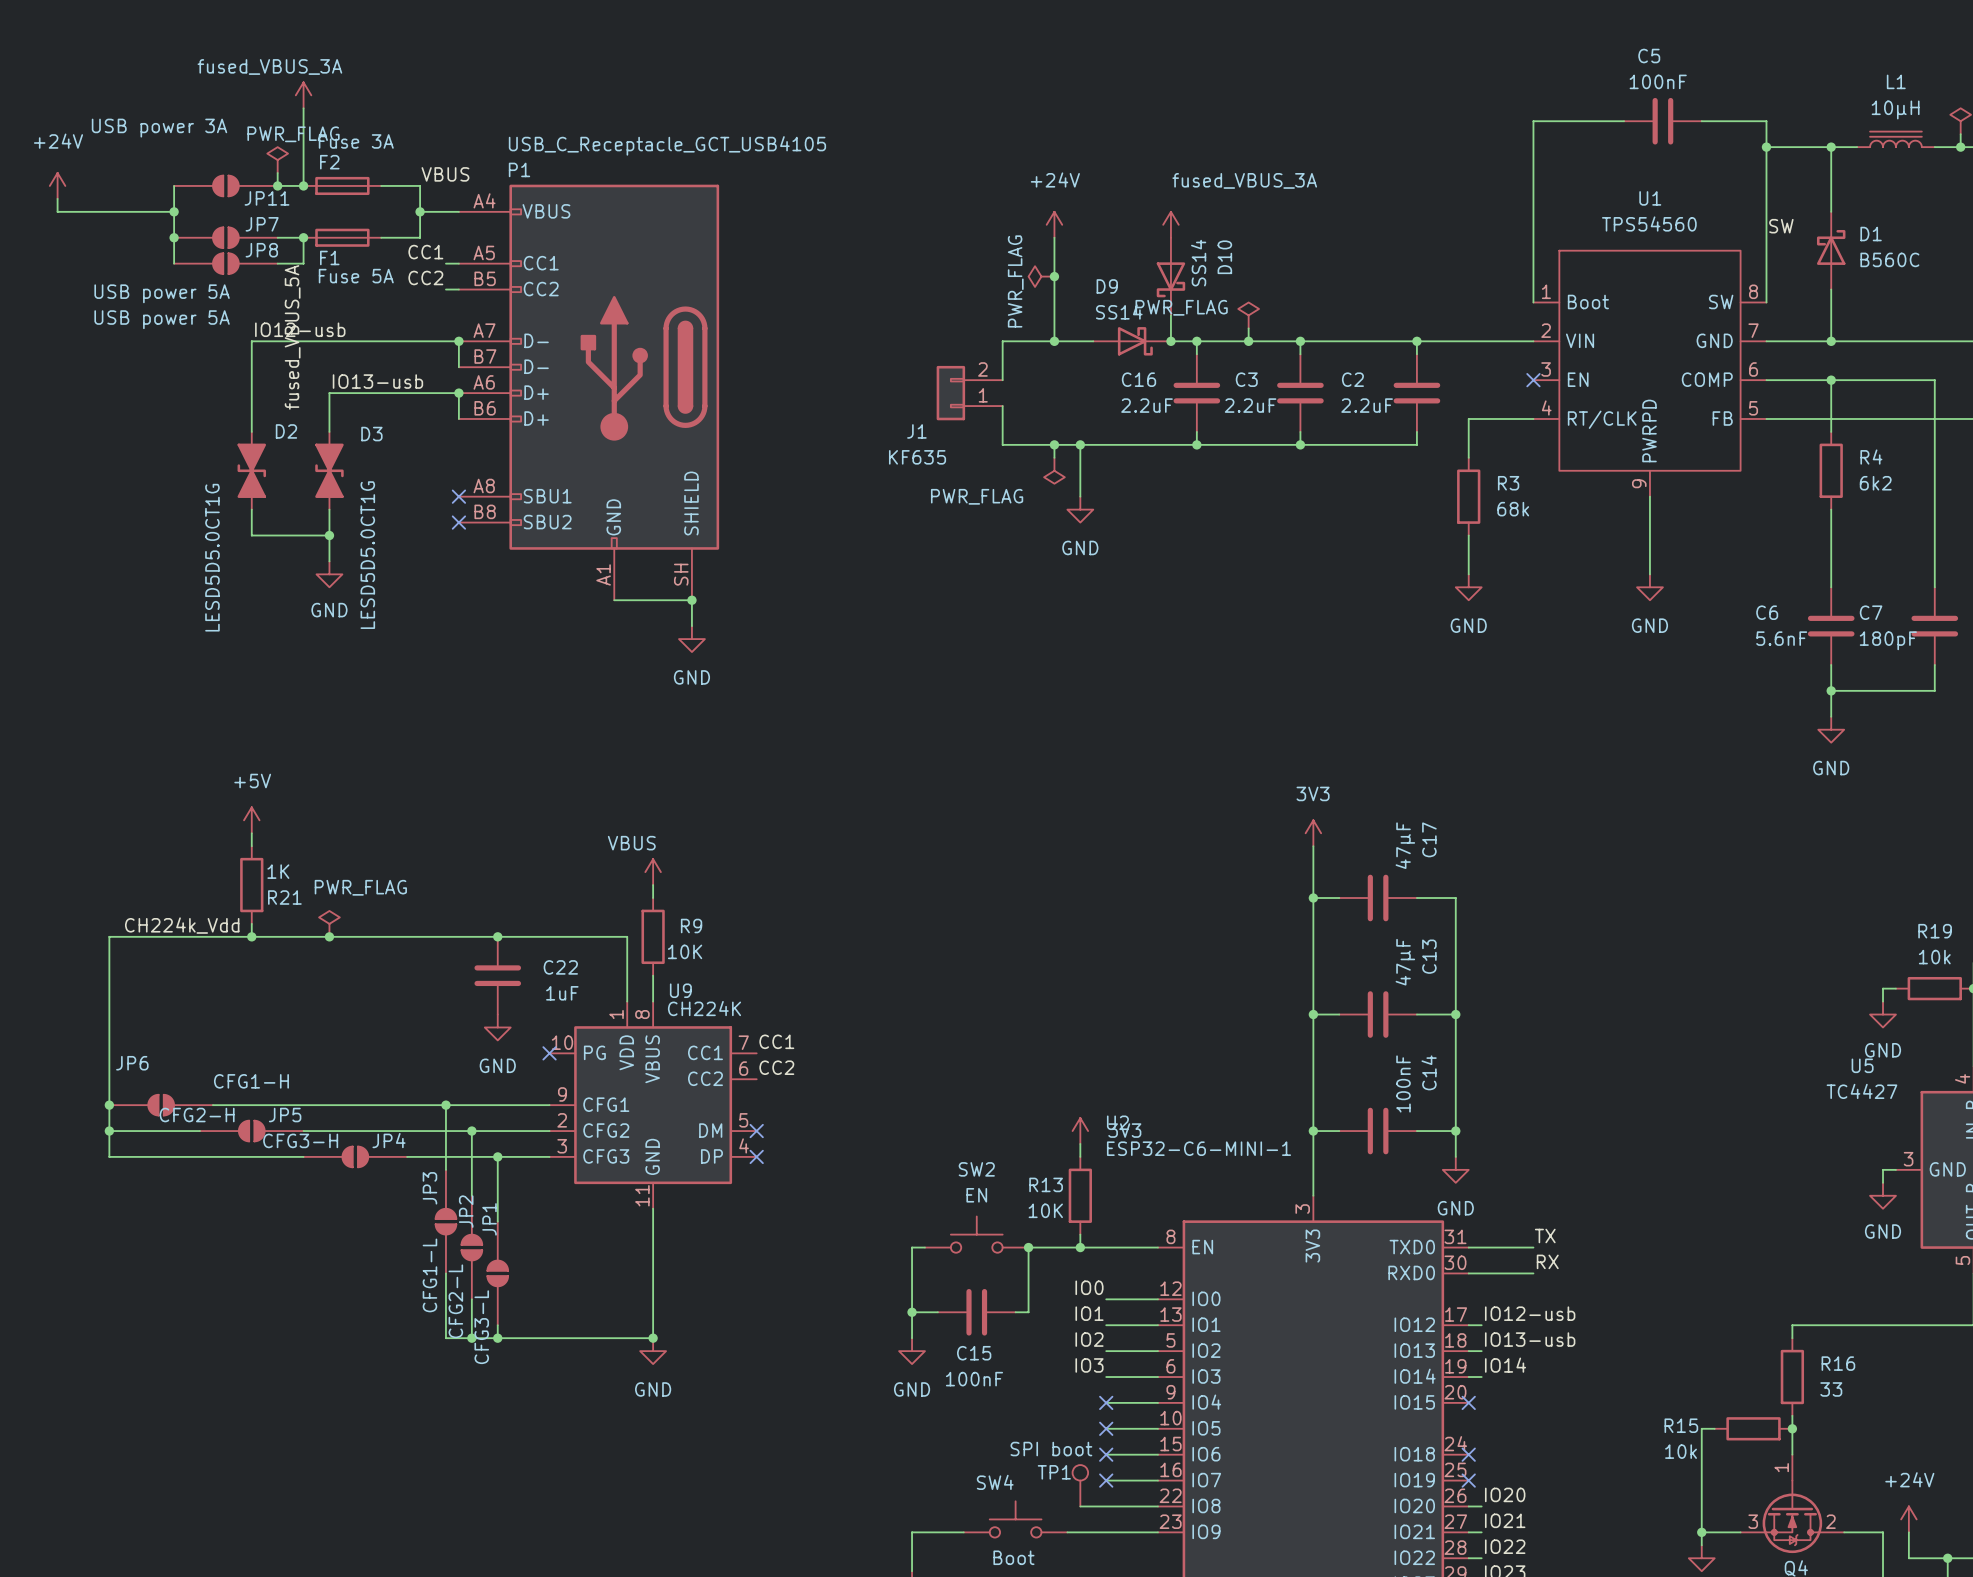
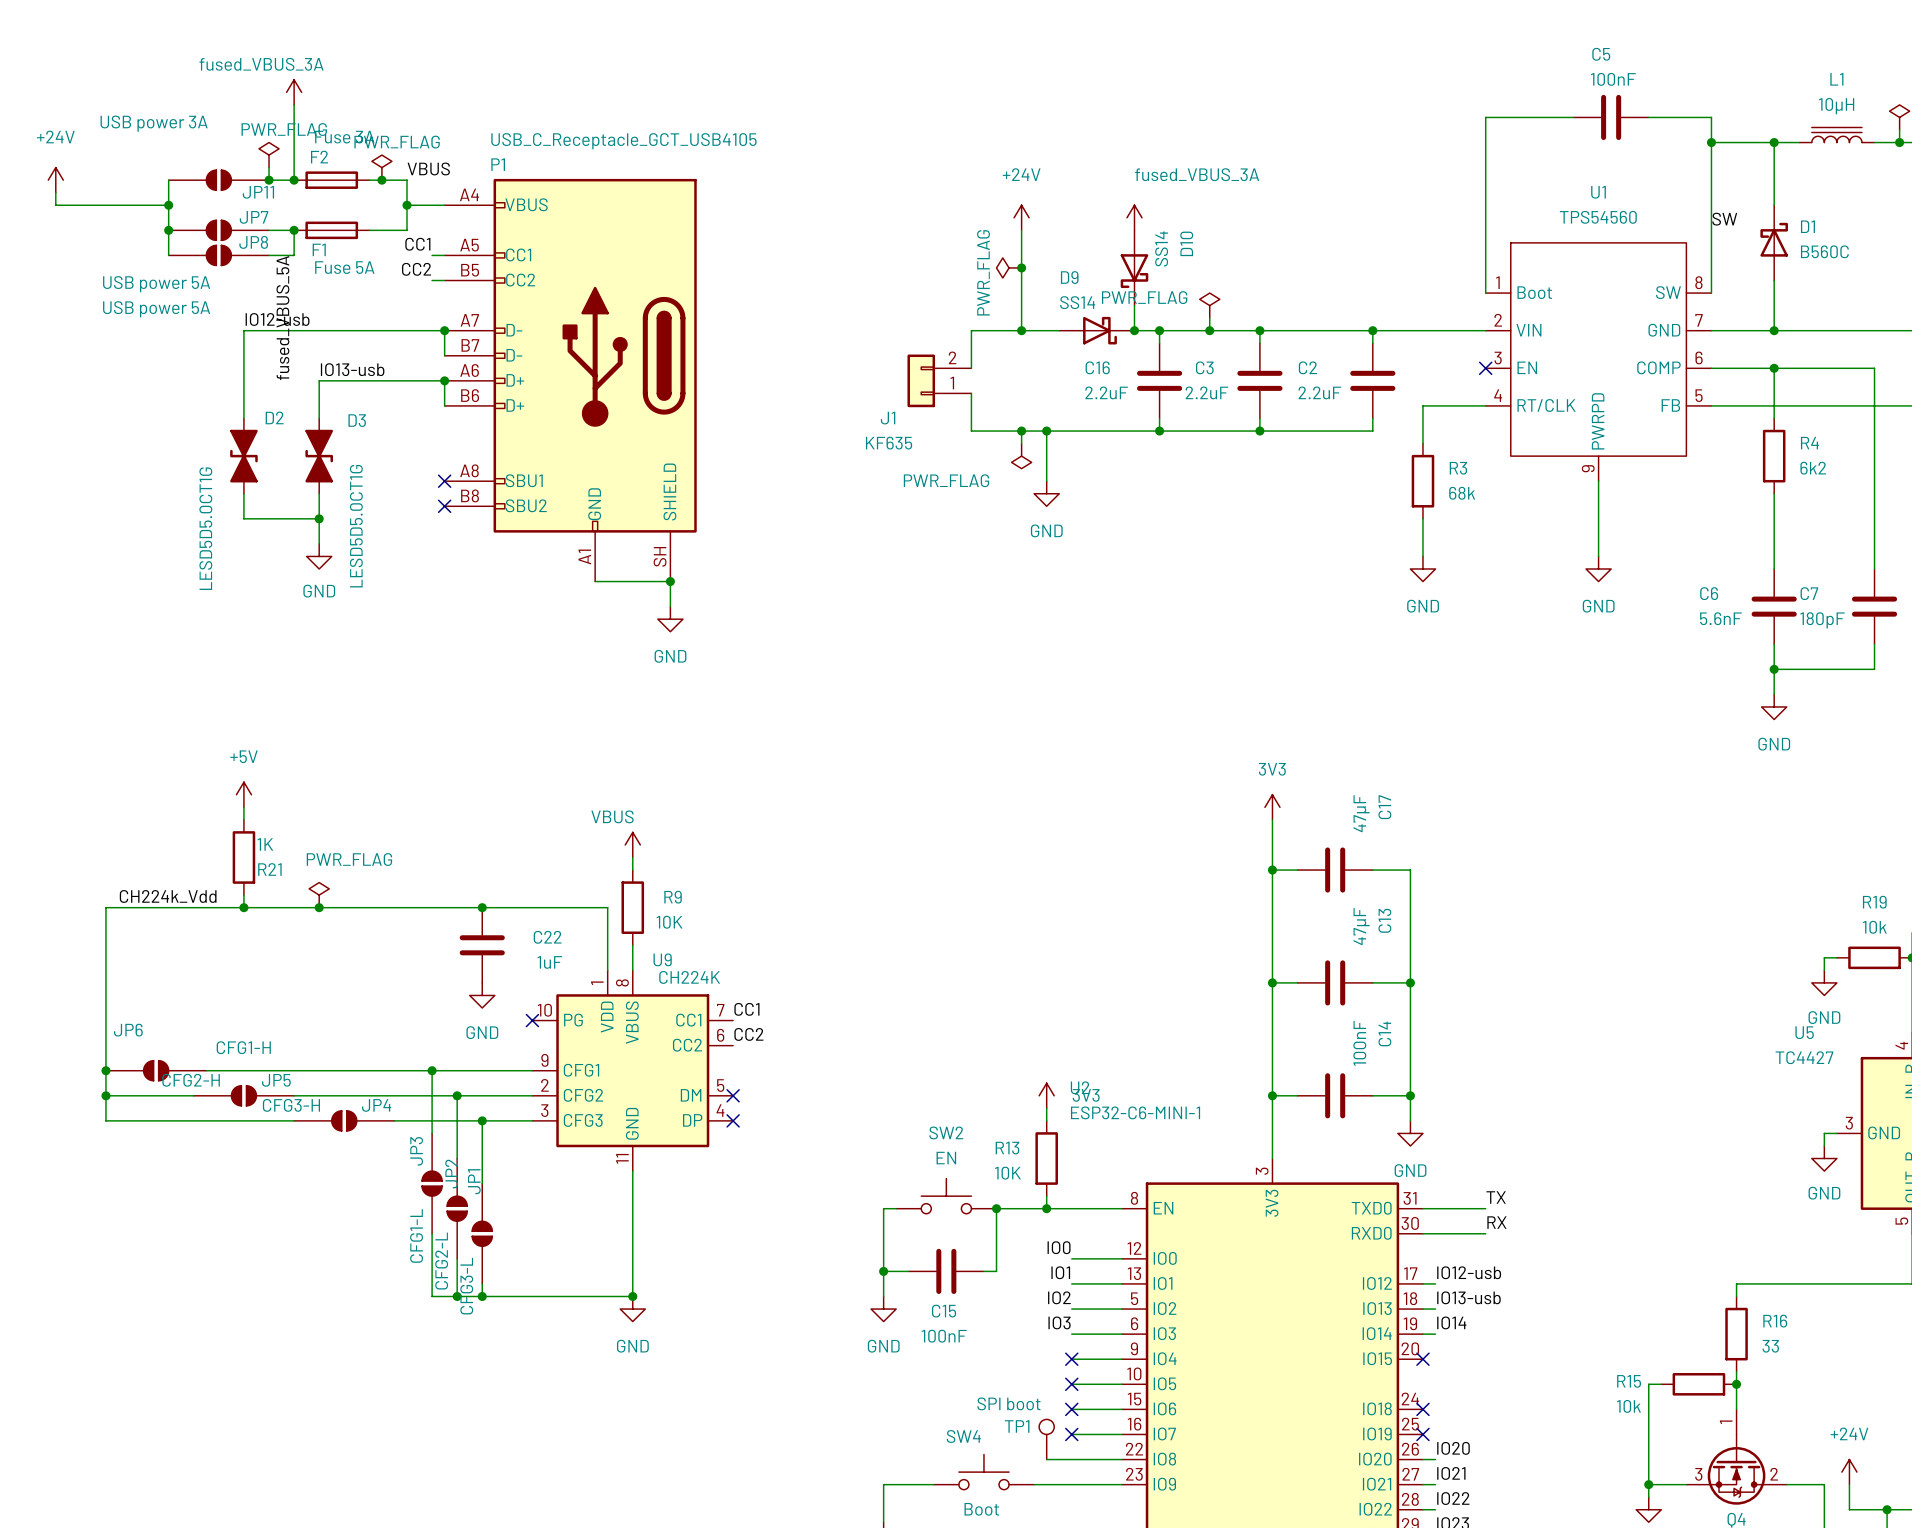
power symbol: none -> PWR_FLAG (381, 167)
junction: none -> (381, 180)

